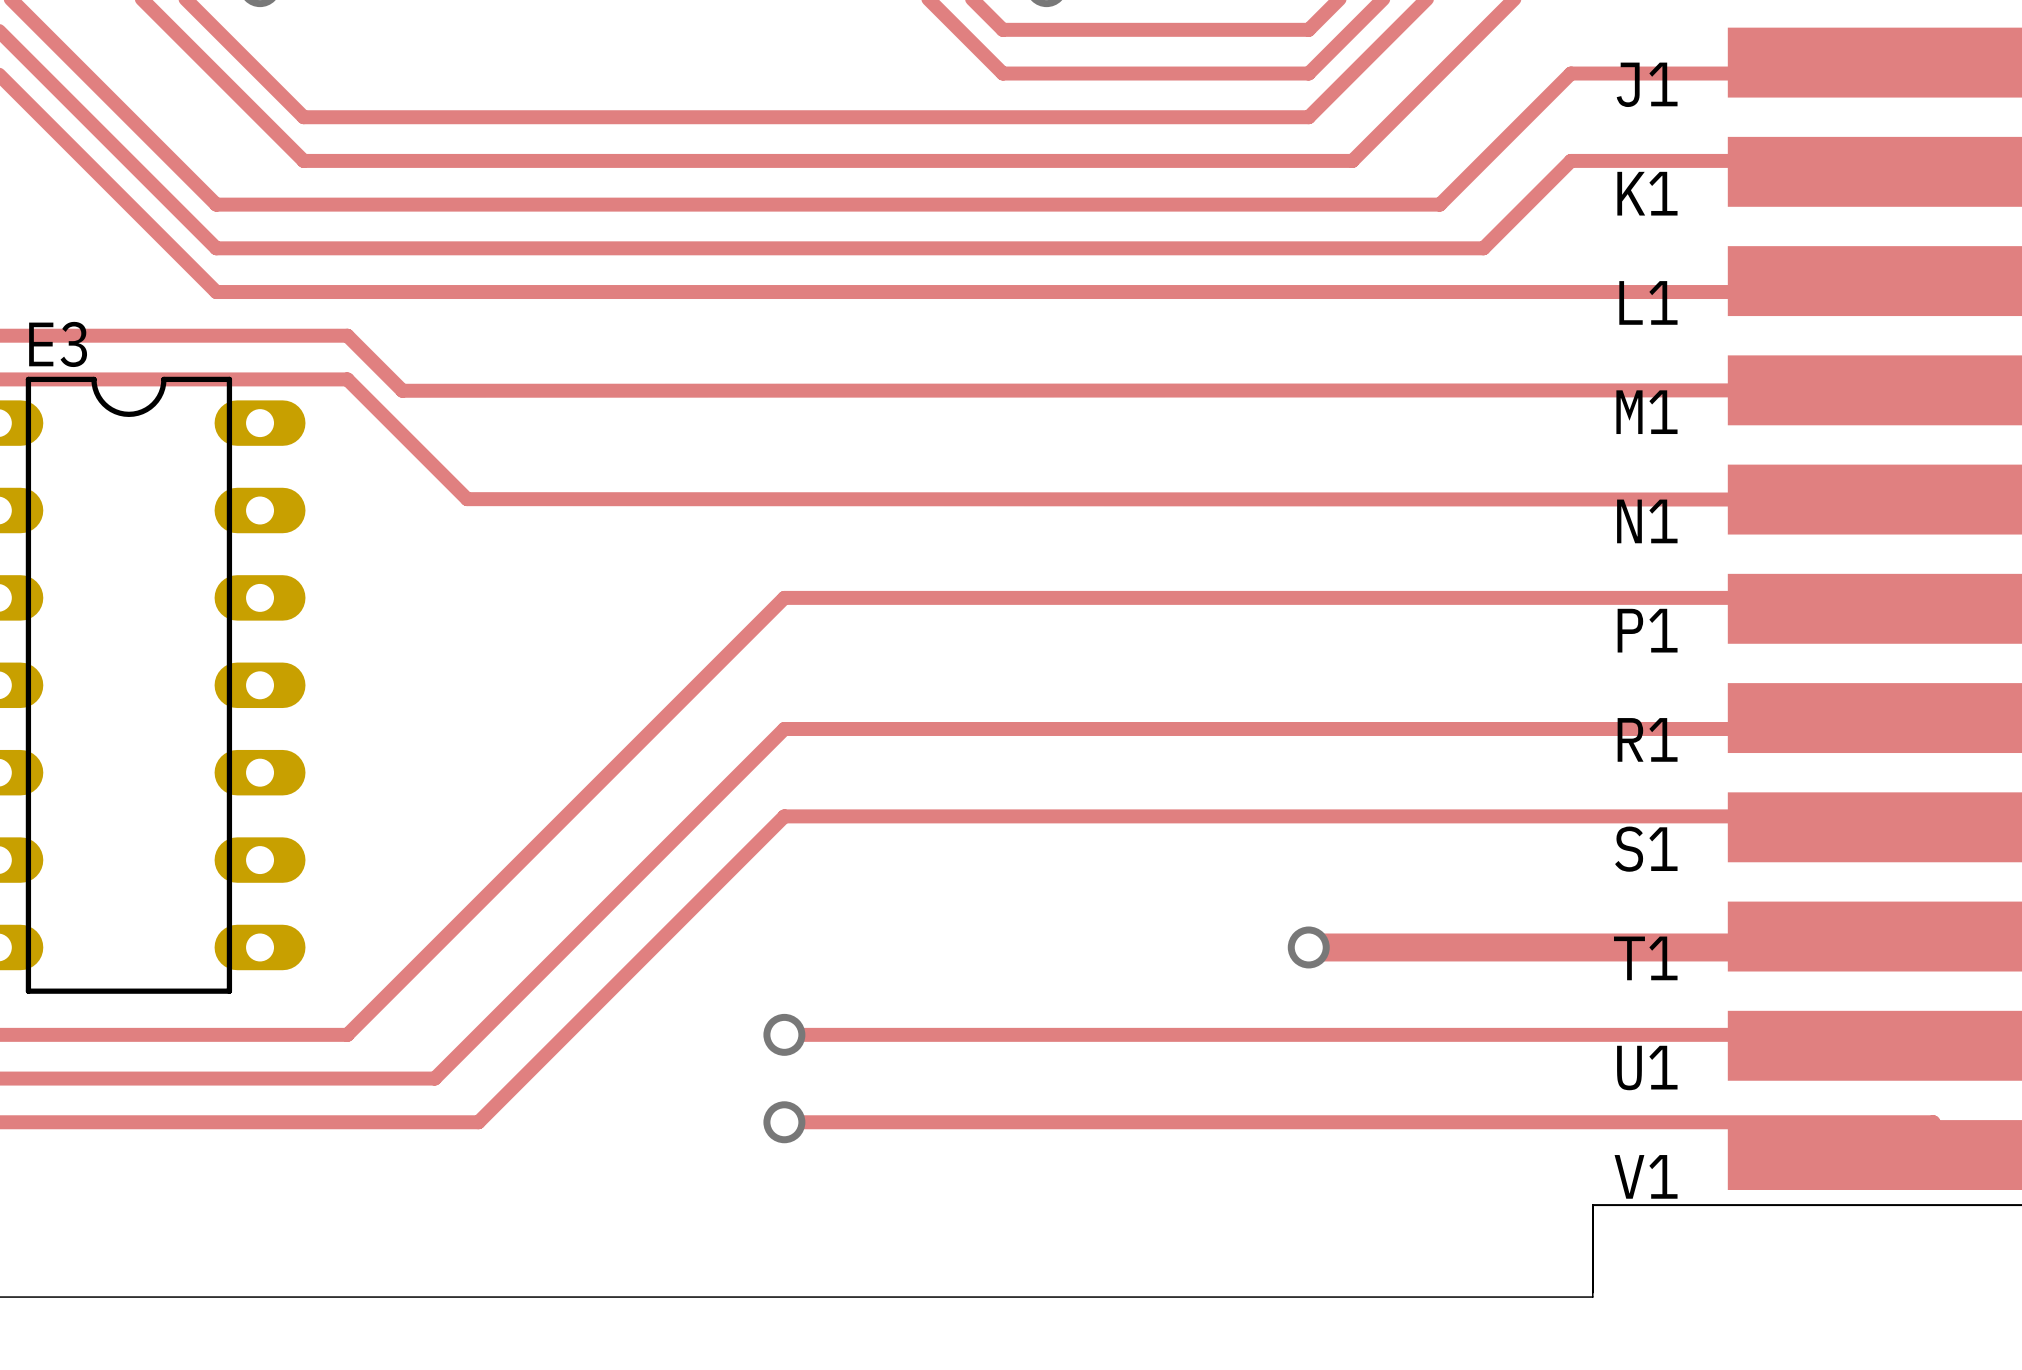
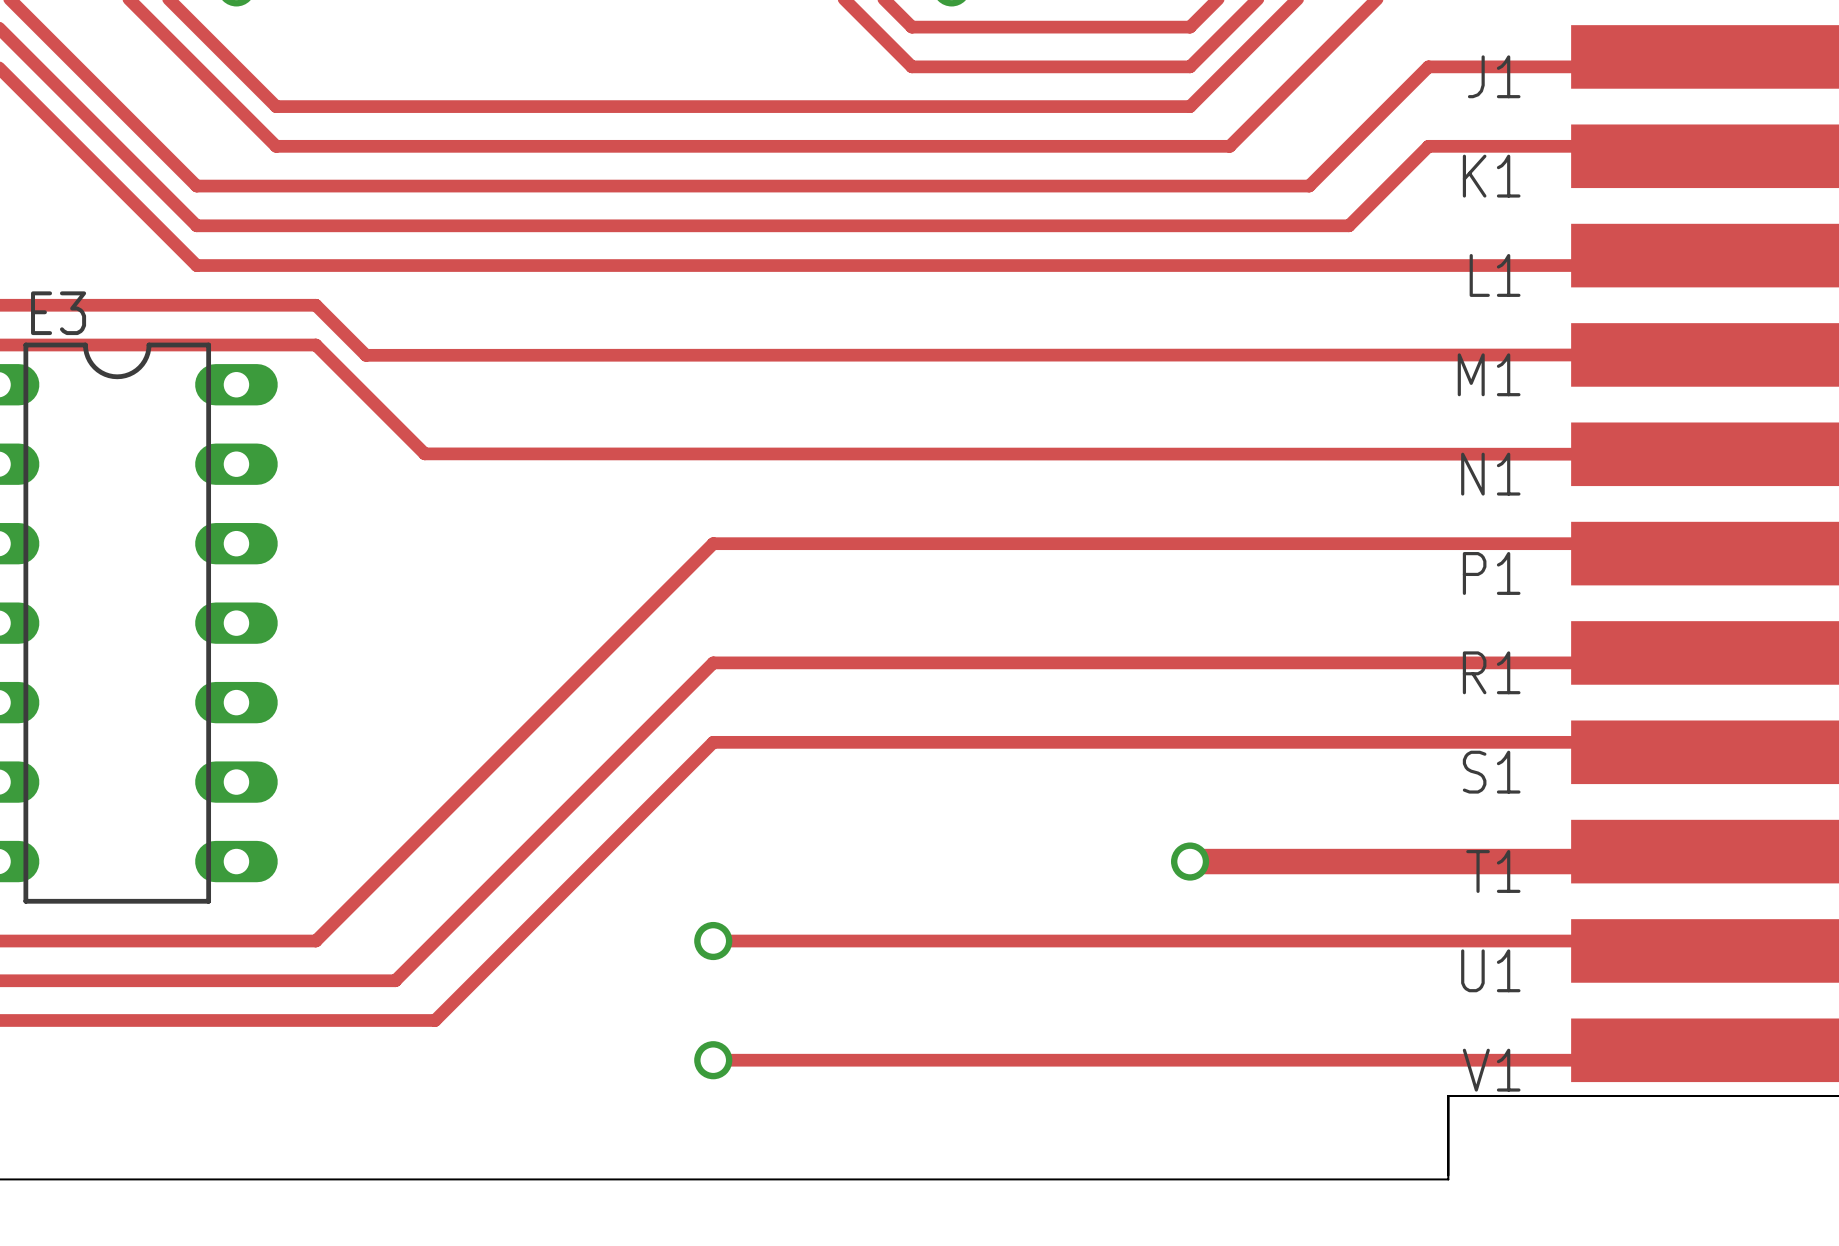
track: (784, 1122) (1933, 1122) (1953, 1155) -> (713, 1060) (1757, 1060) (1776, 1050)
via position: (784, 1122) -> (713, 1060)

